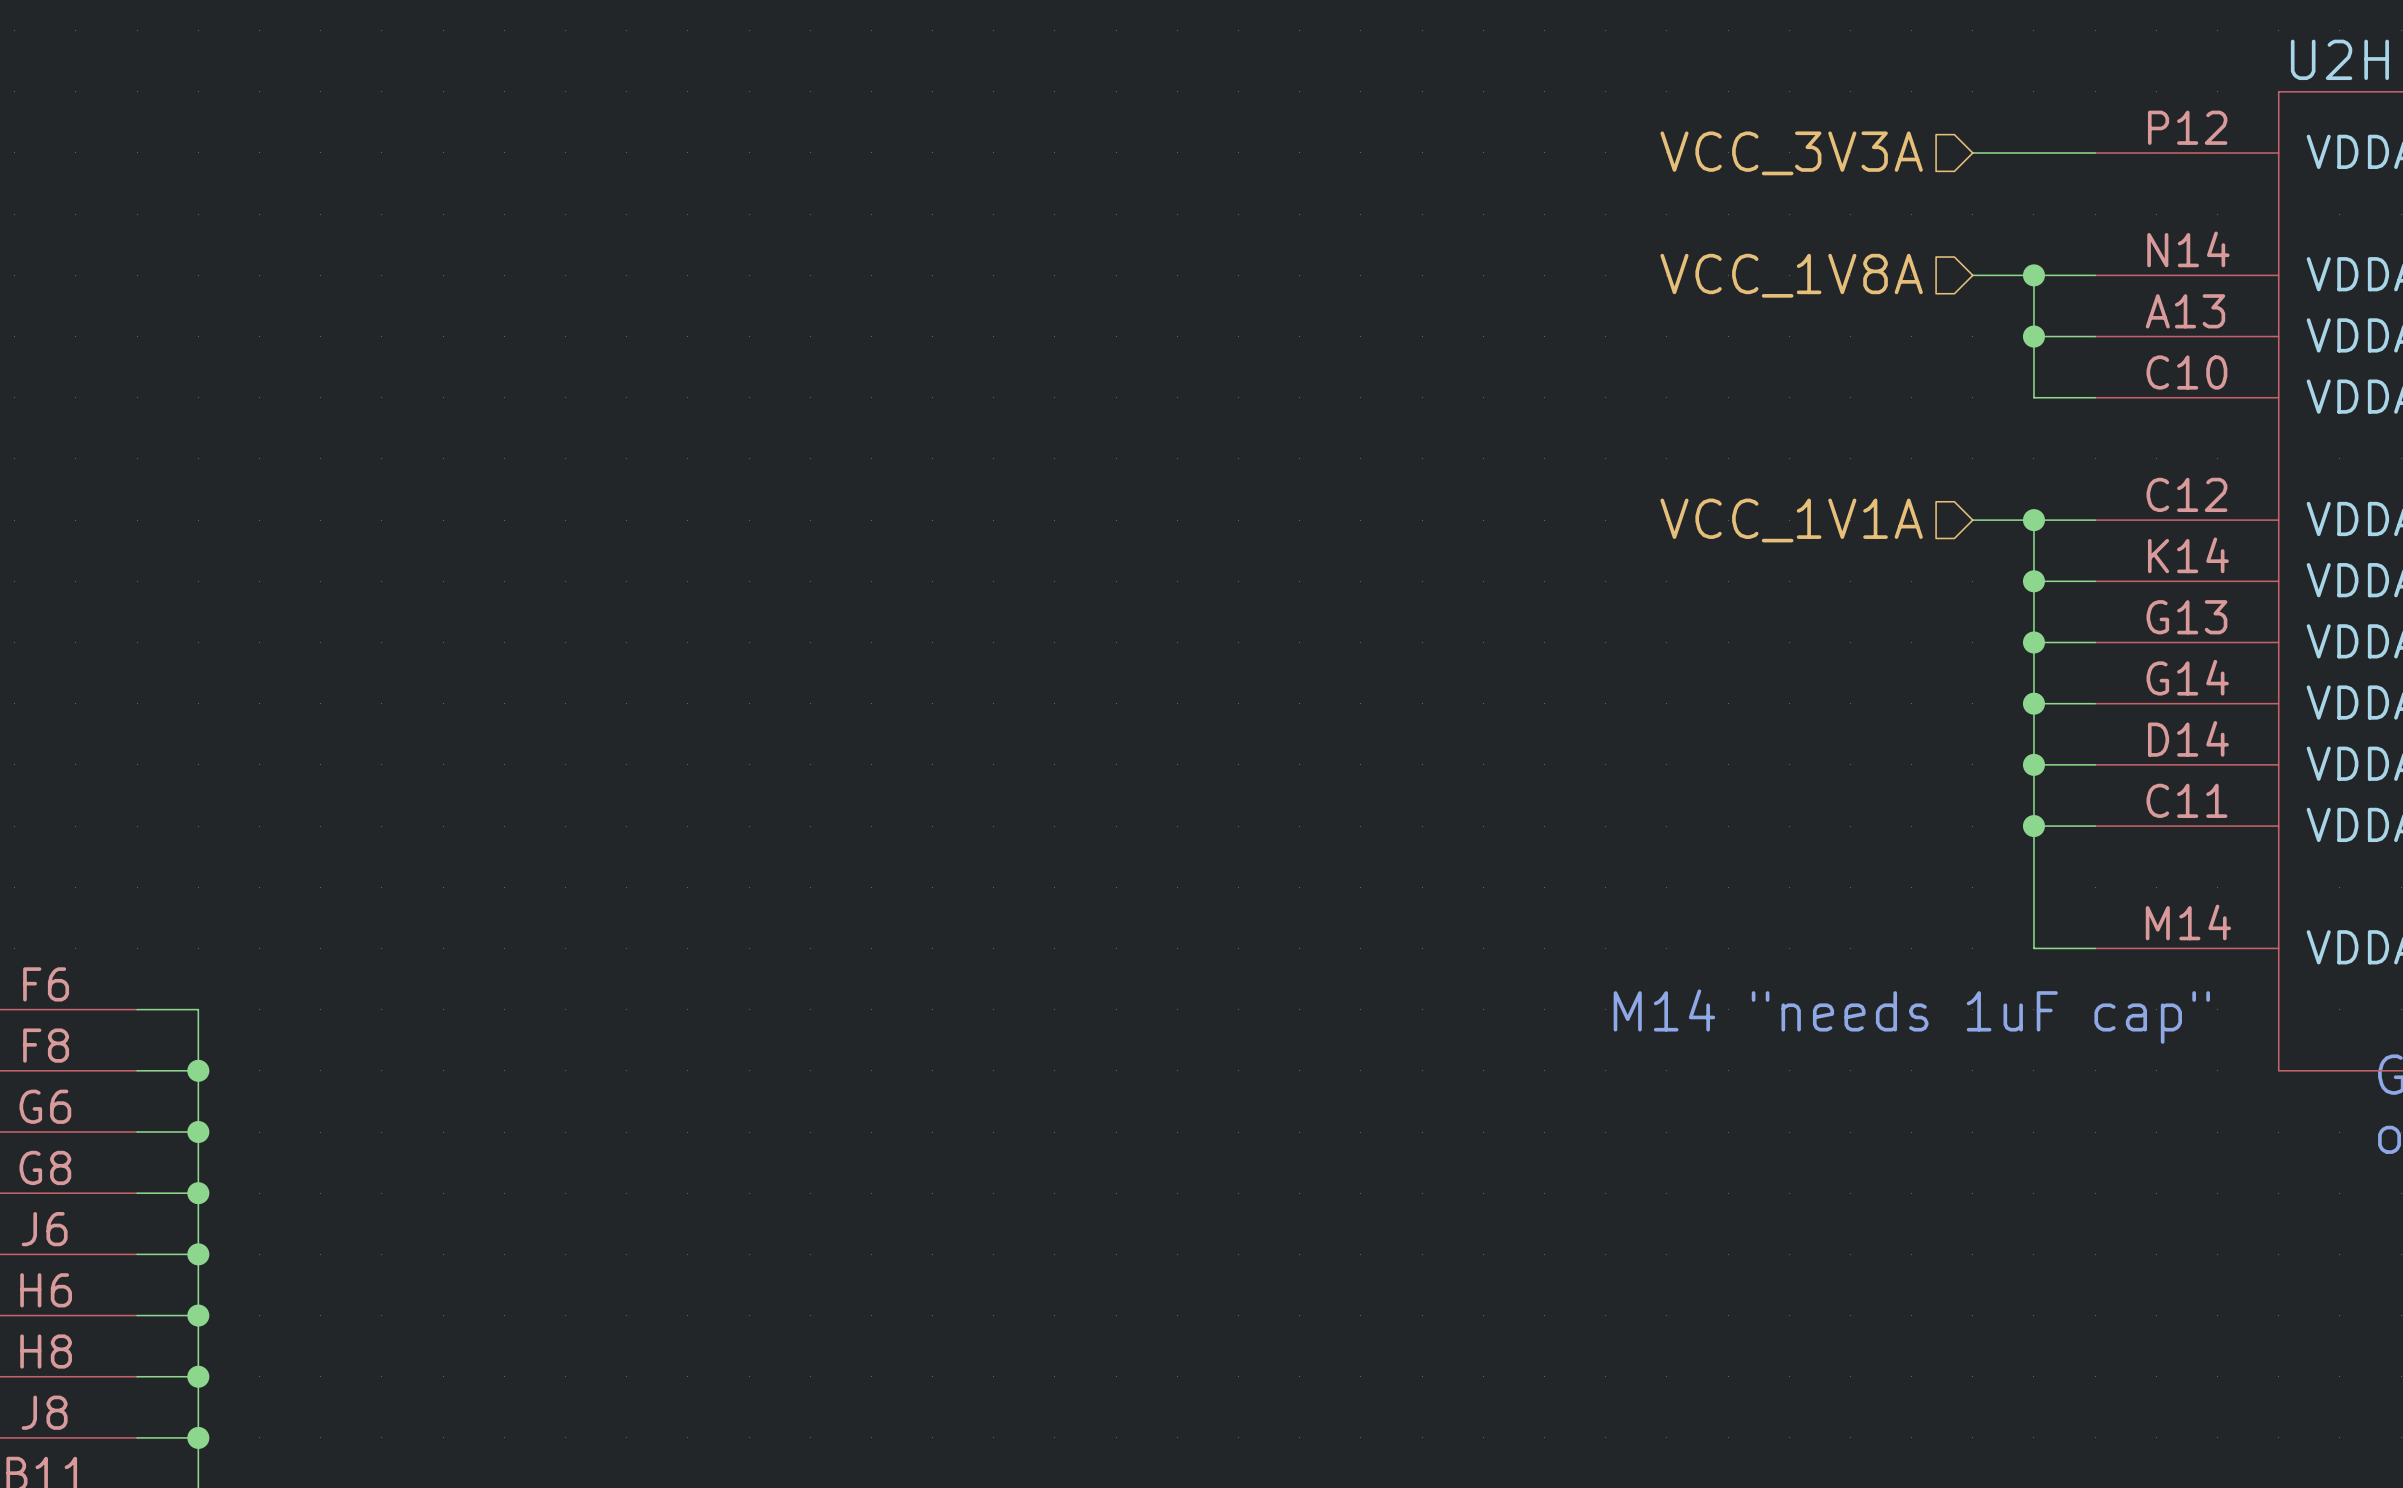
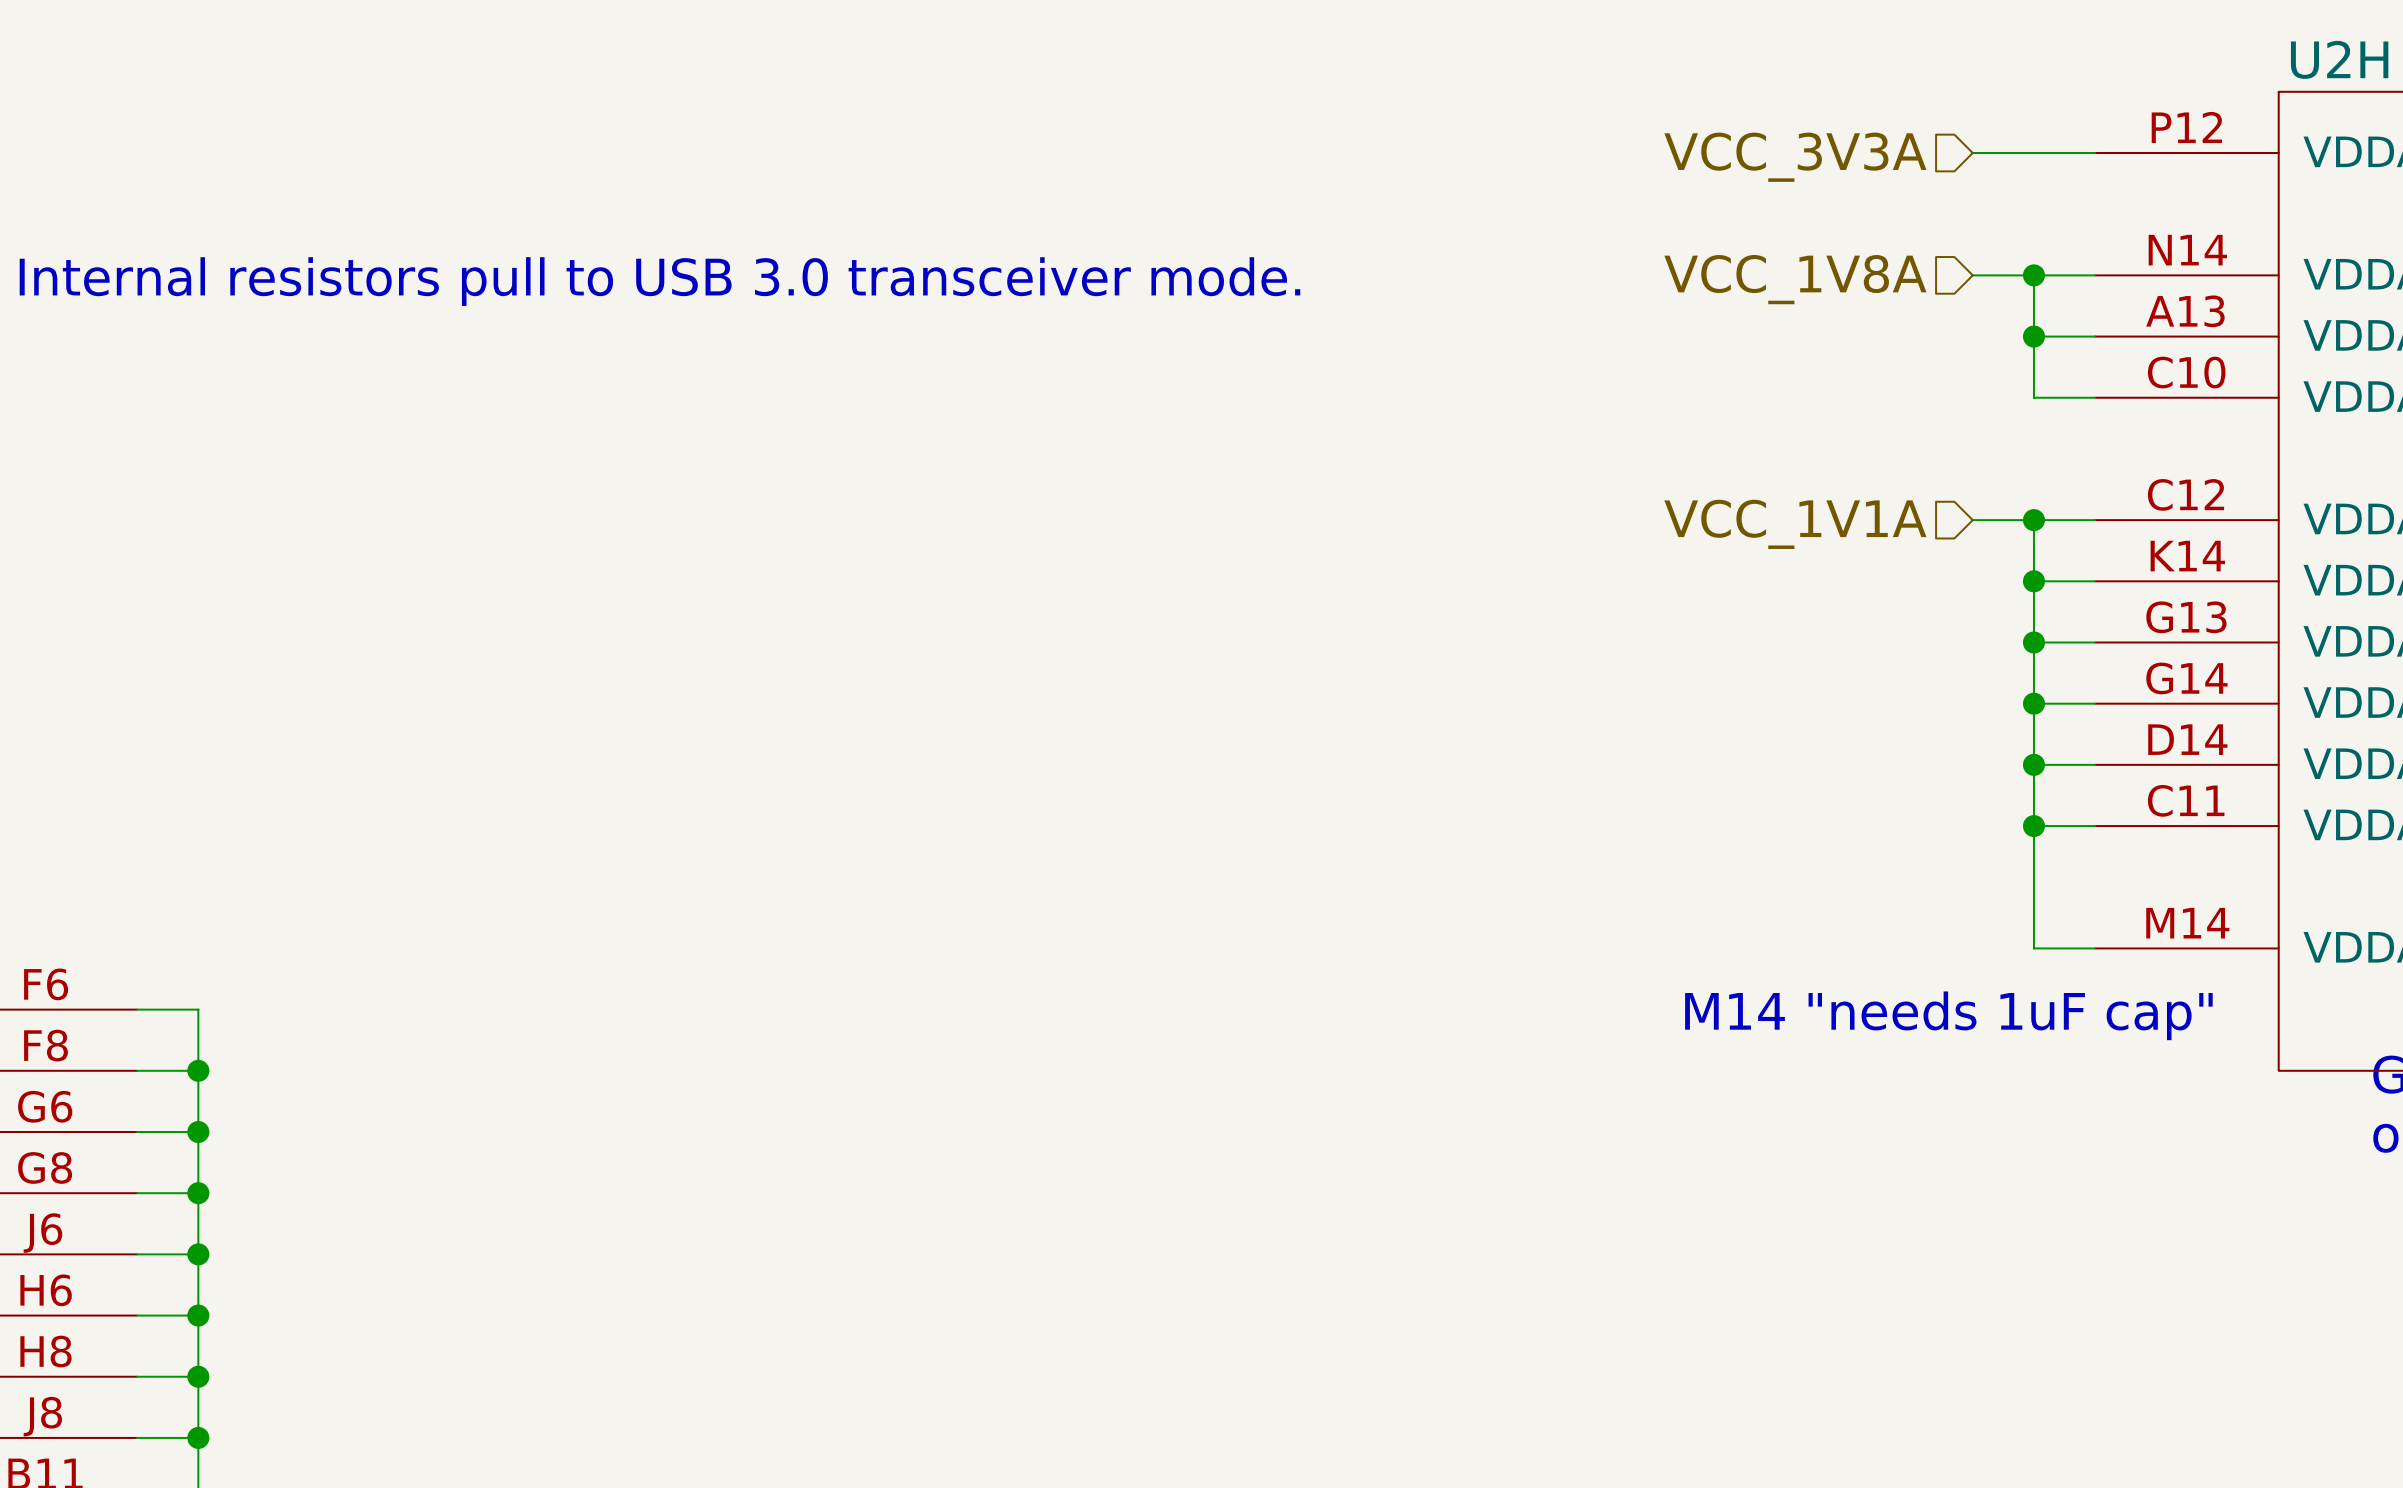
text: none -> Internal resistors pull to USB 3.0 transceiver mode. (659, 281)

